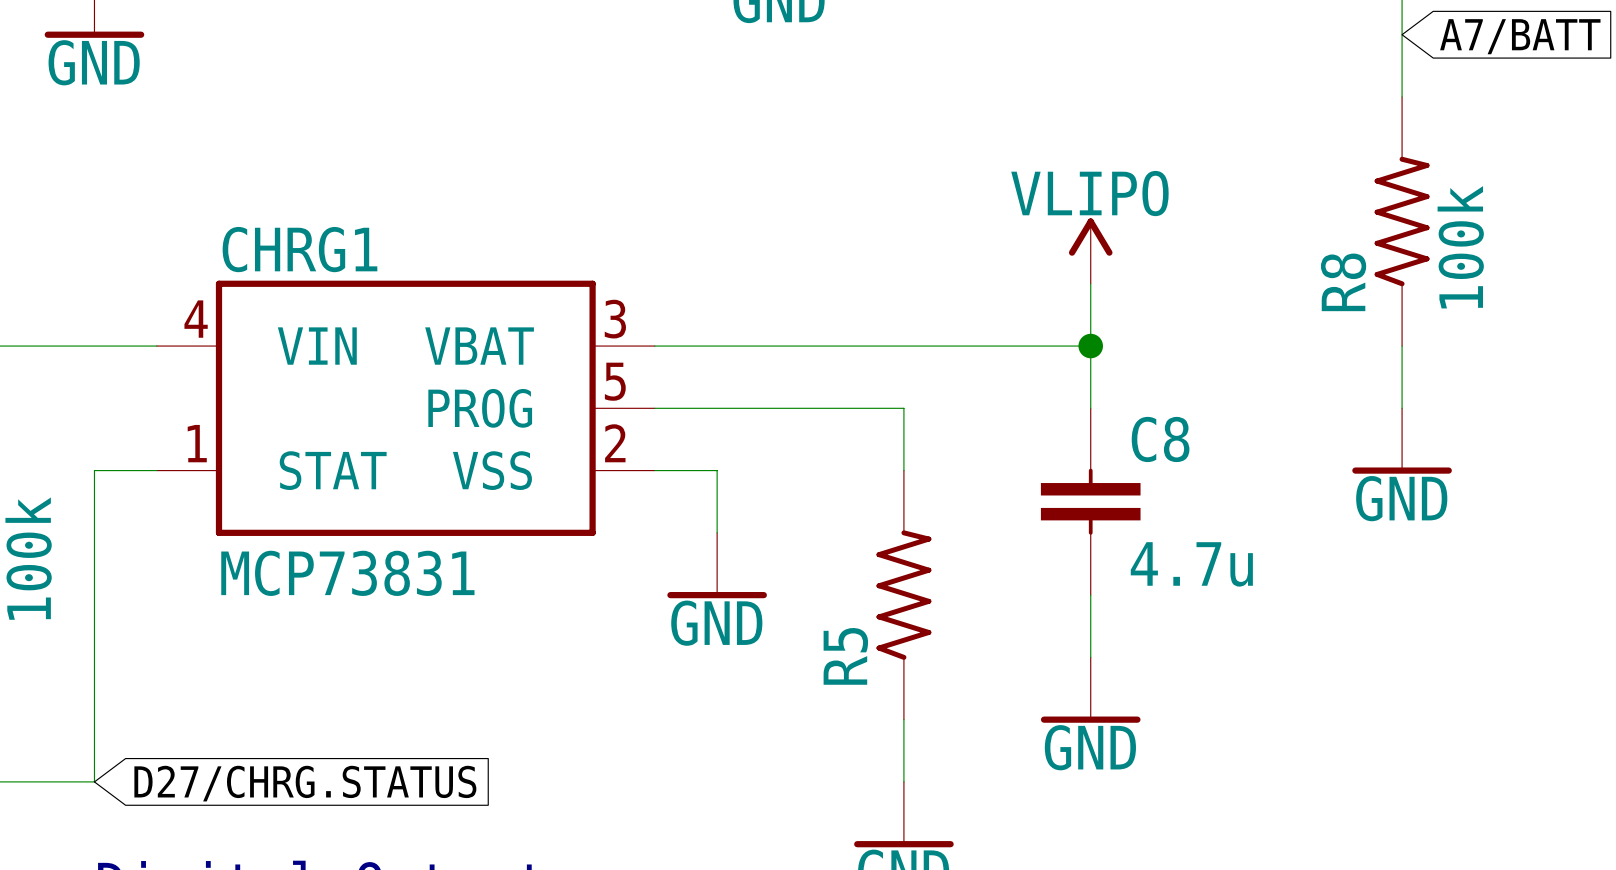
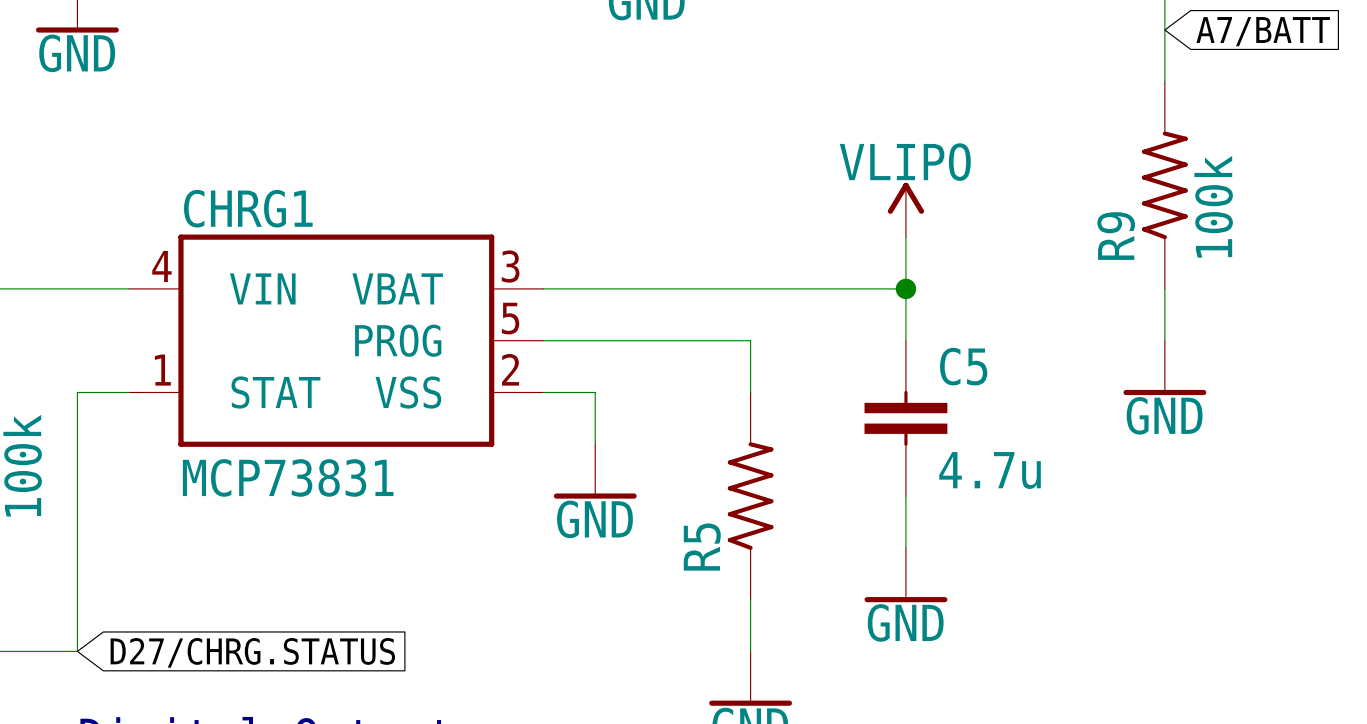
R8 name: R8 (1343, 282) -> R9 (1116, 236)
C8 name: C8 (1160, 439) -> C5 (963, 366)

